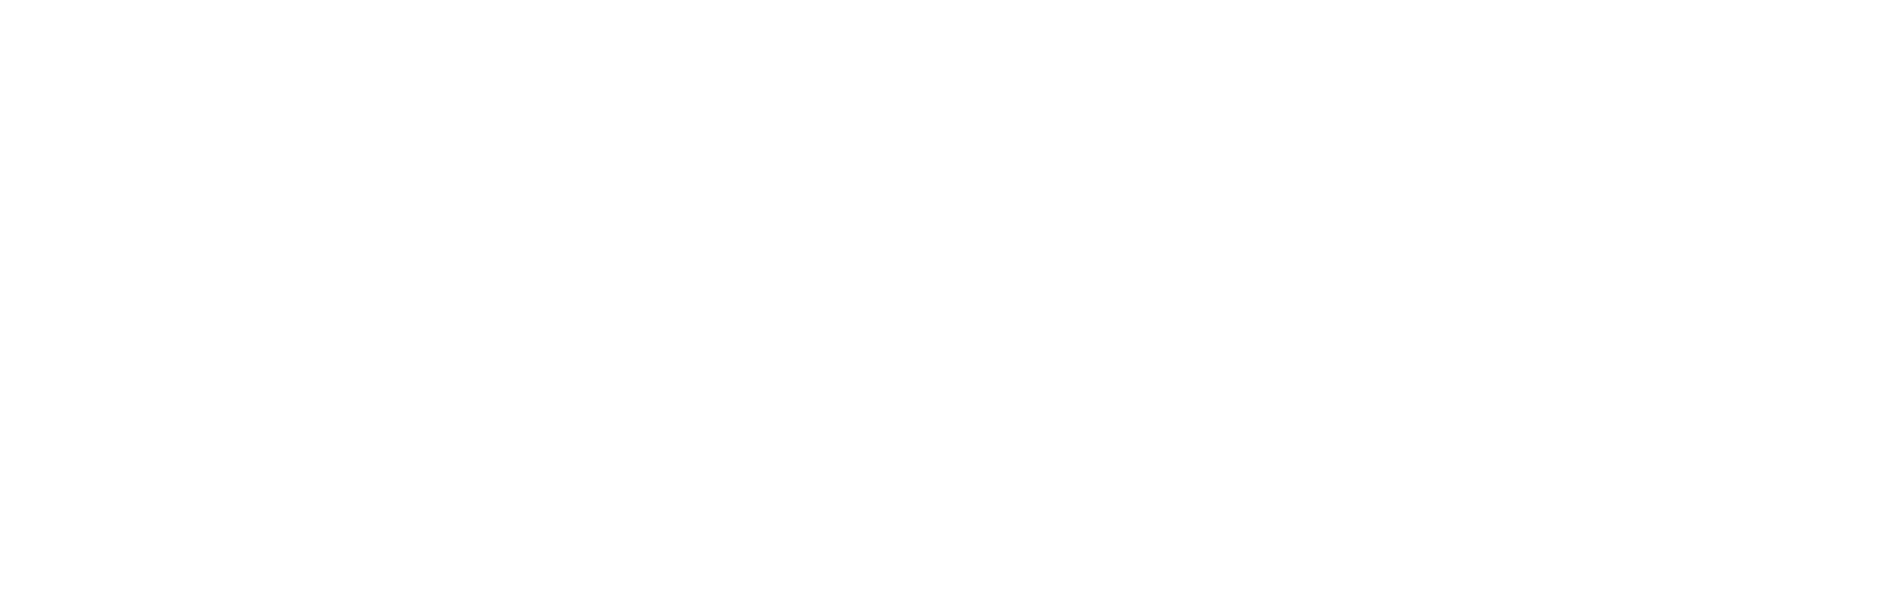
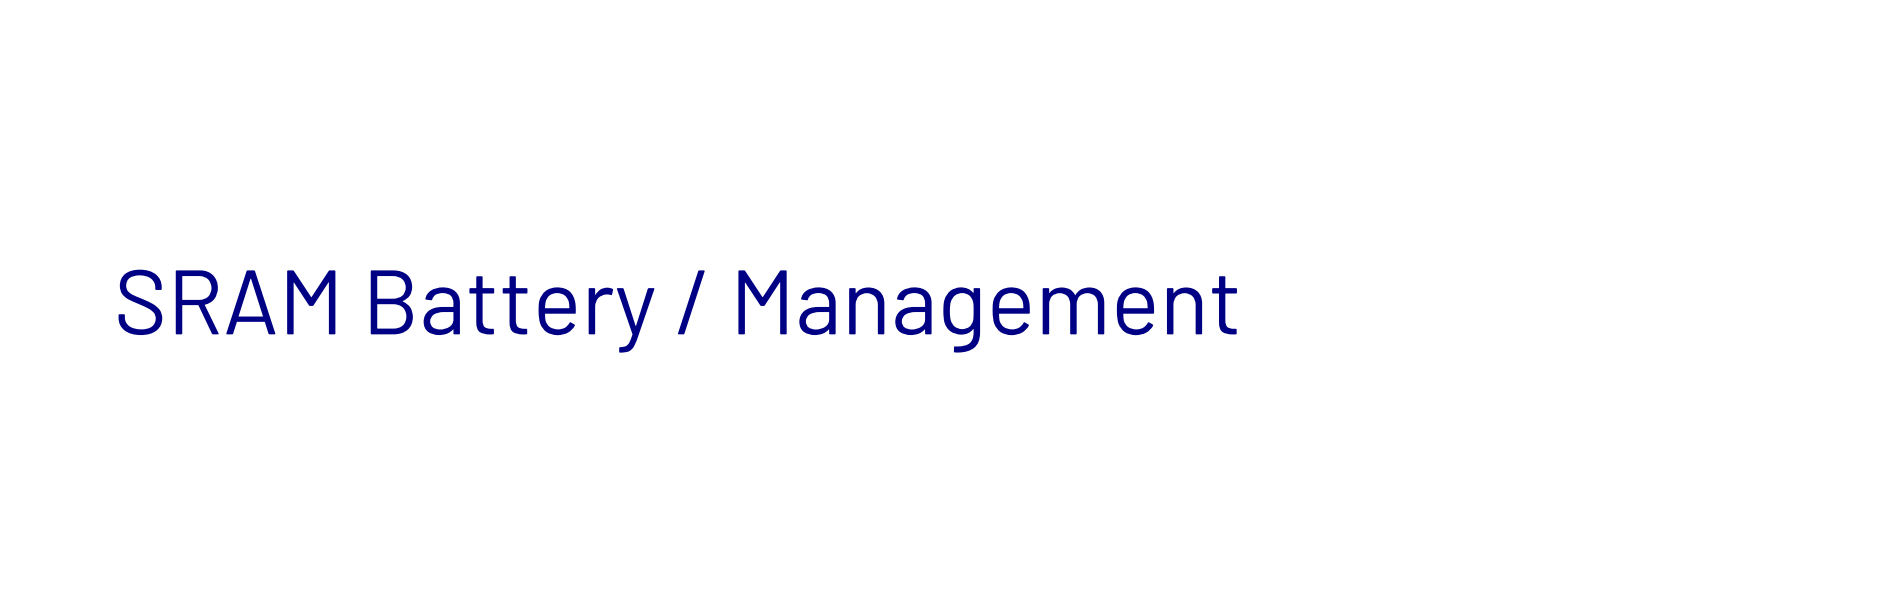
text: none -> SRAM Battery / Management (677, 311)

